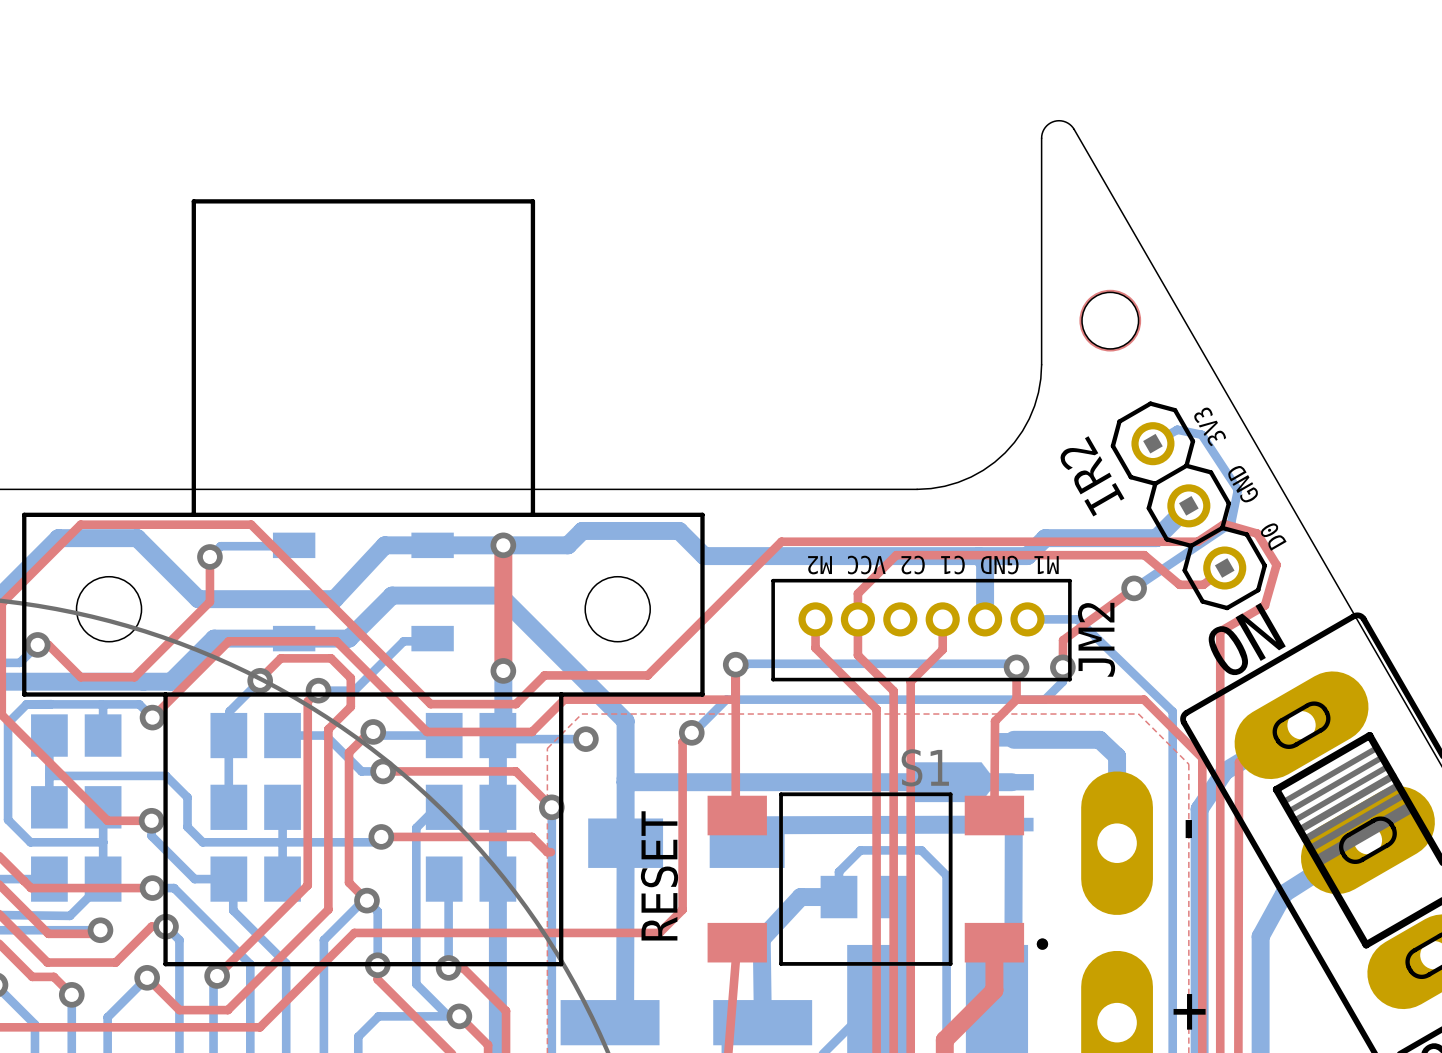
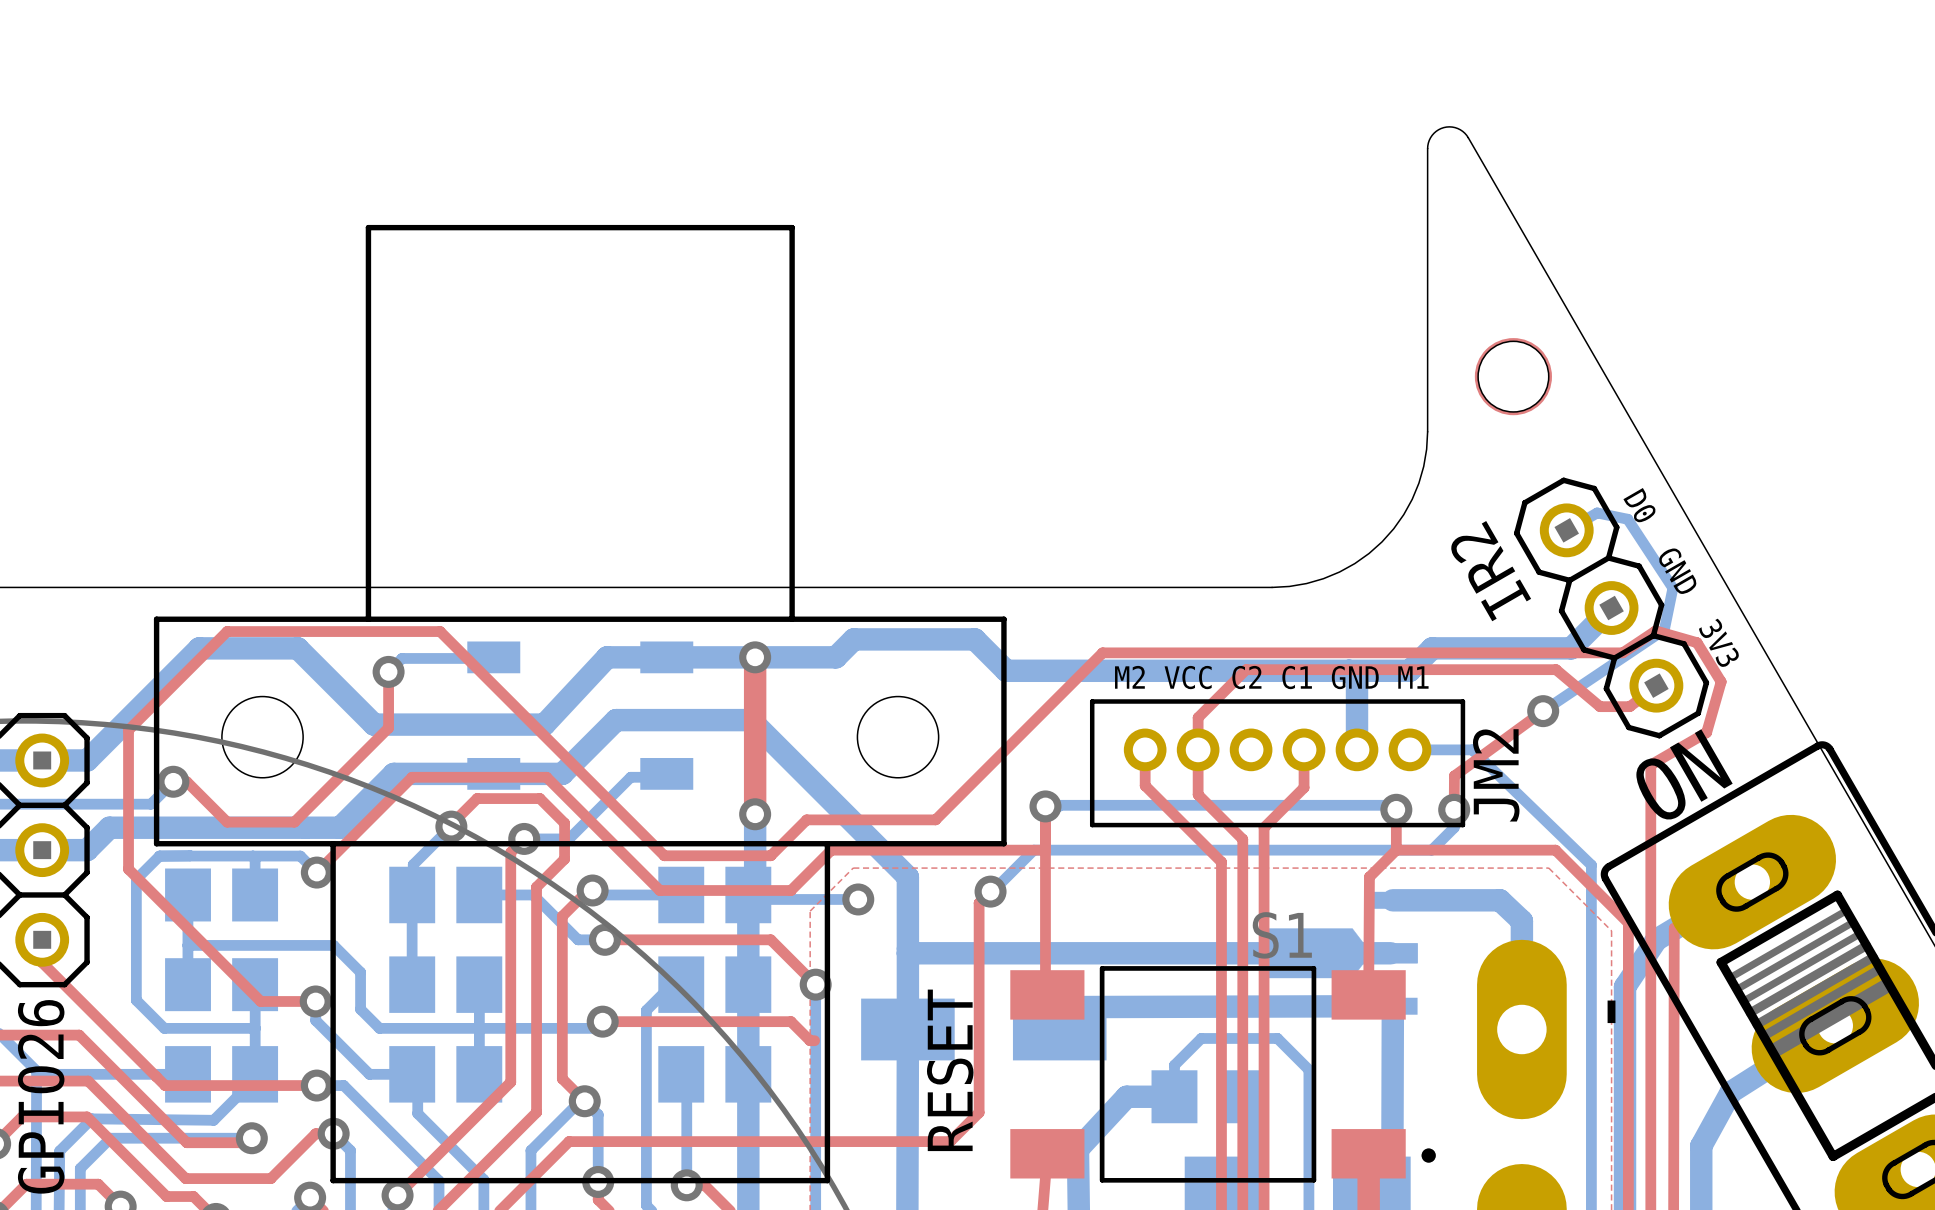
text rotation: 0° (1240, 478) -> 180° (1681, 577)
text: none -> M2 VCC C2 C1 GND M1 (1271, 677)
text: M1 GND C1 C2 VCC M2 (933, 565) -> none

